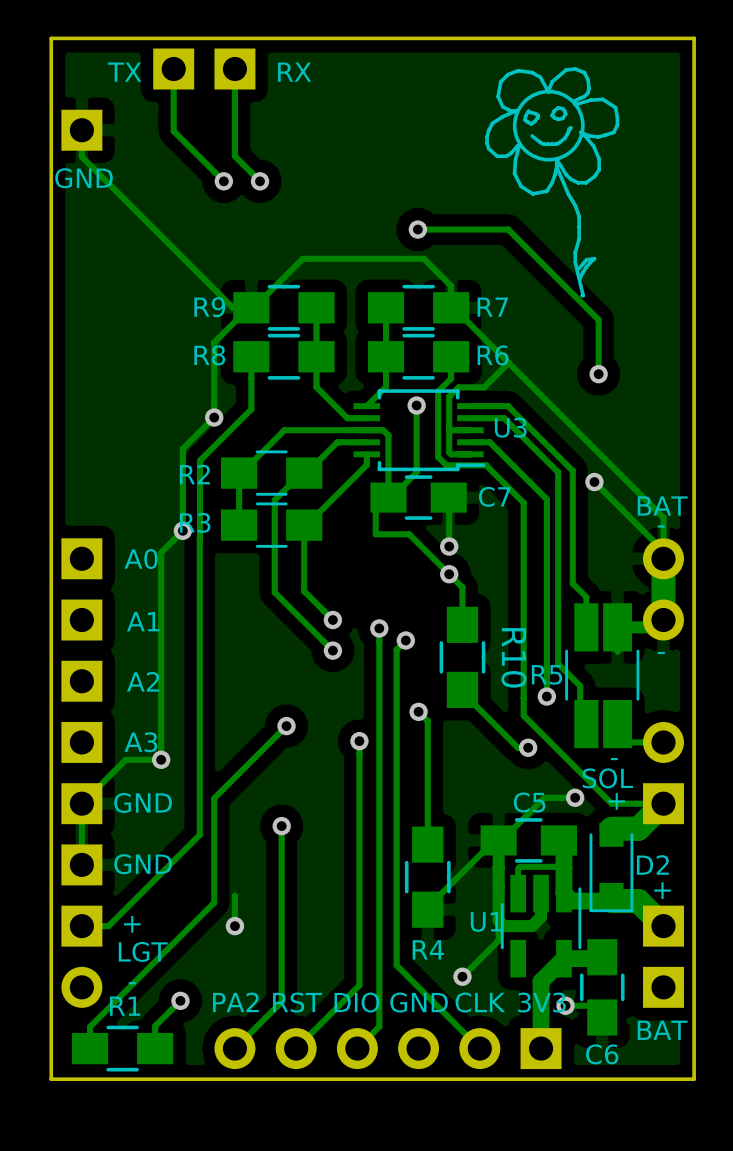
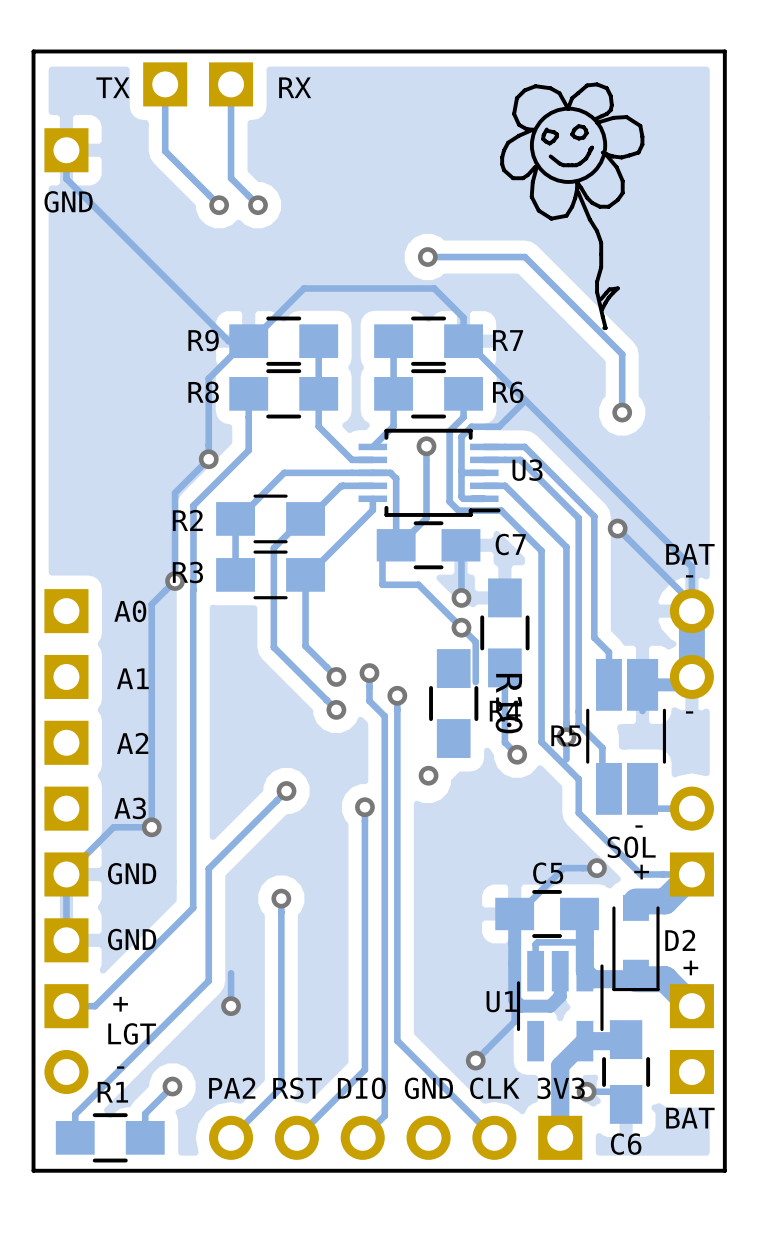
track: none -> (504, 667) (504, 742) (517, 754)
via: none -> (369, 673)
track: (379, 628) (377, 1028) -> (369, 673) (369, 701) (384, 716) (384, 1115)
via: (379, 628) -> none
via: none -> (397, 695)
track: (405, 640) (396, 649) (396, 965) -> (397, 695) (397, 1040) (404, 1048)
via: (405, 640) -> none
R10 position: (462, 657) -> (453, 703)
track: (523, 680) (523, 715) (611, 803) (616, 803) -> (541, 742) (578, 779) (578, 812) (640, 874)
track: (462, 689) (462, 692) (517, 747) (528, 747) -> none
via: none -> (517, 754)
via position: (546, 696) -> (566, 737)
track: (418, 711) (427, 721) (427, 844) -> none
via: (528, 747) -> none
track: (494, 840) (427, 907) (427, 909) -> none
R4 position: (427, 877) -> (504, 632)

